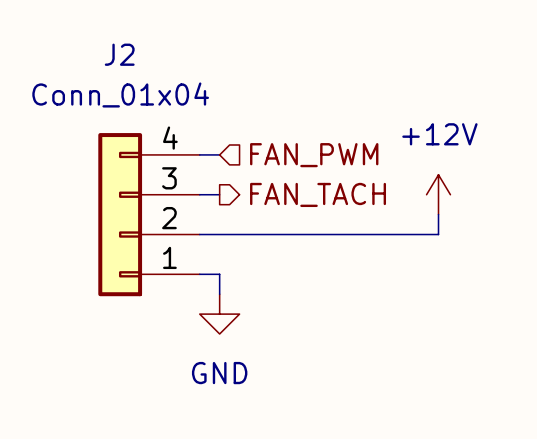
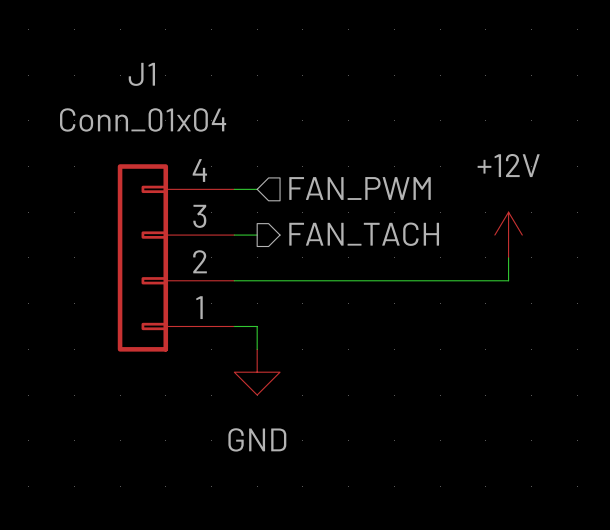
J2 name: J2 (119, 54) -> J1 (141, 74)

